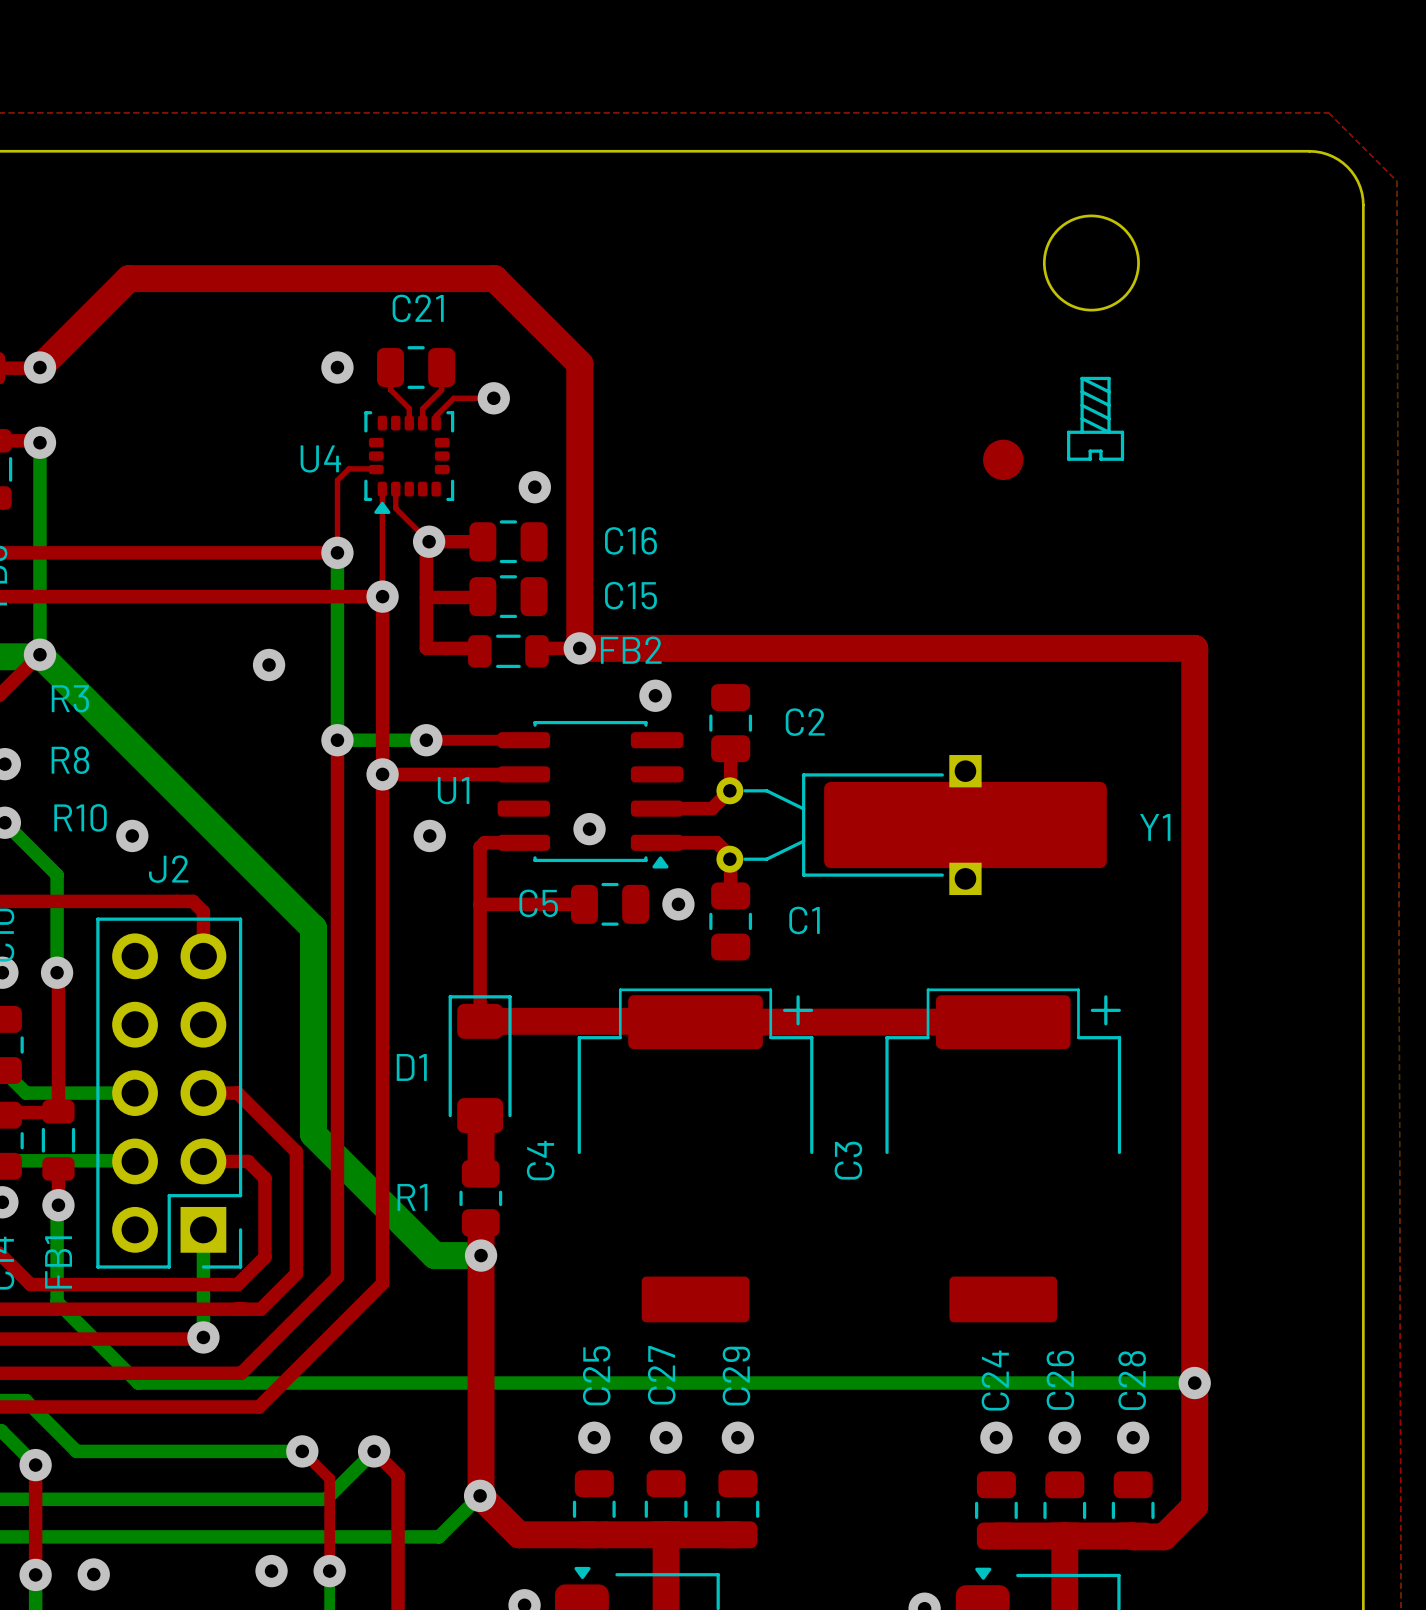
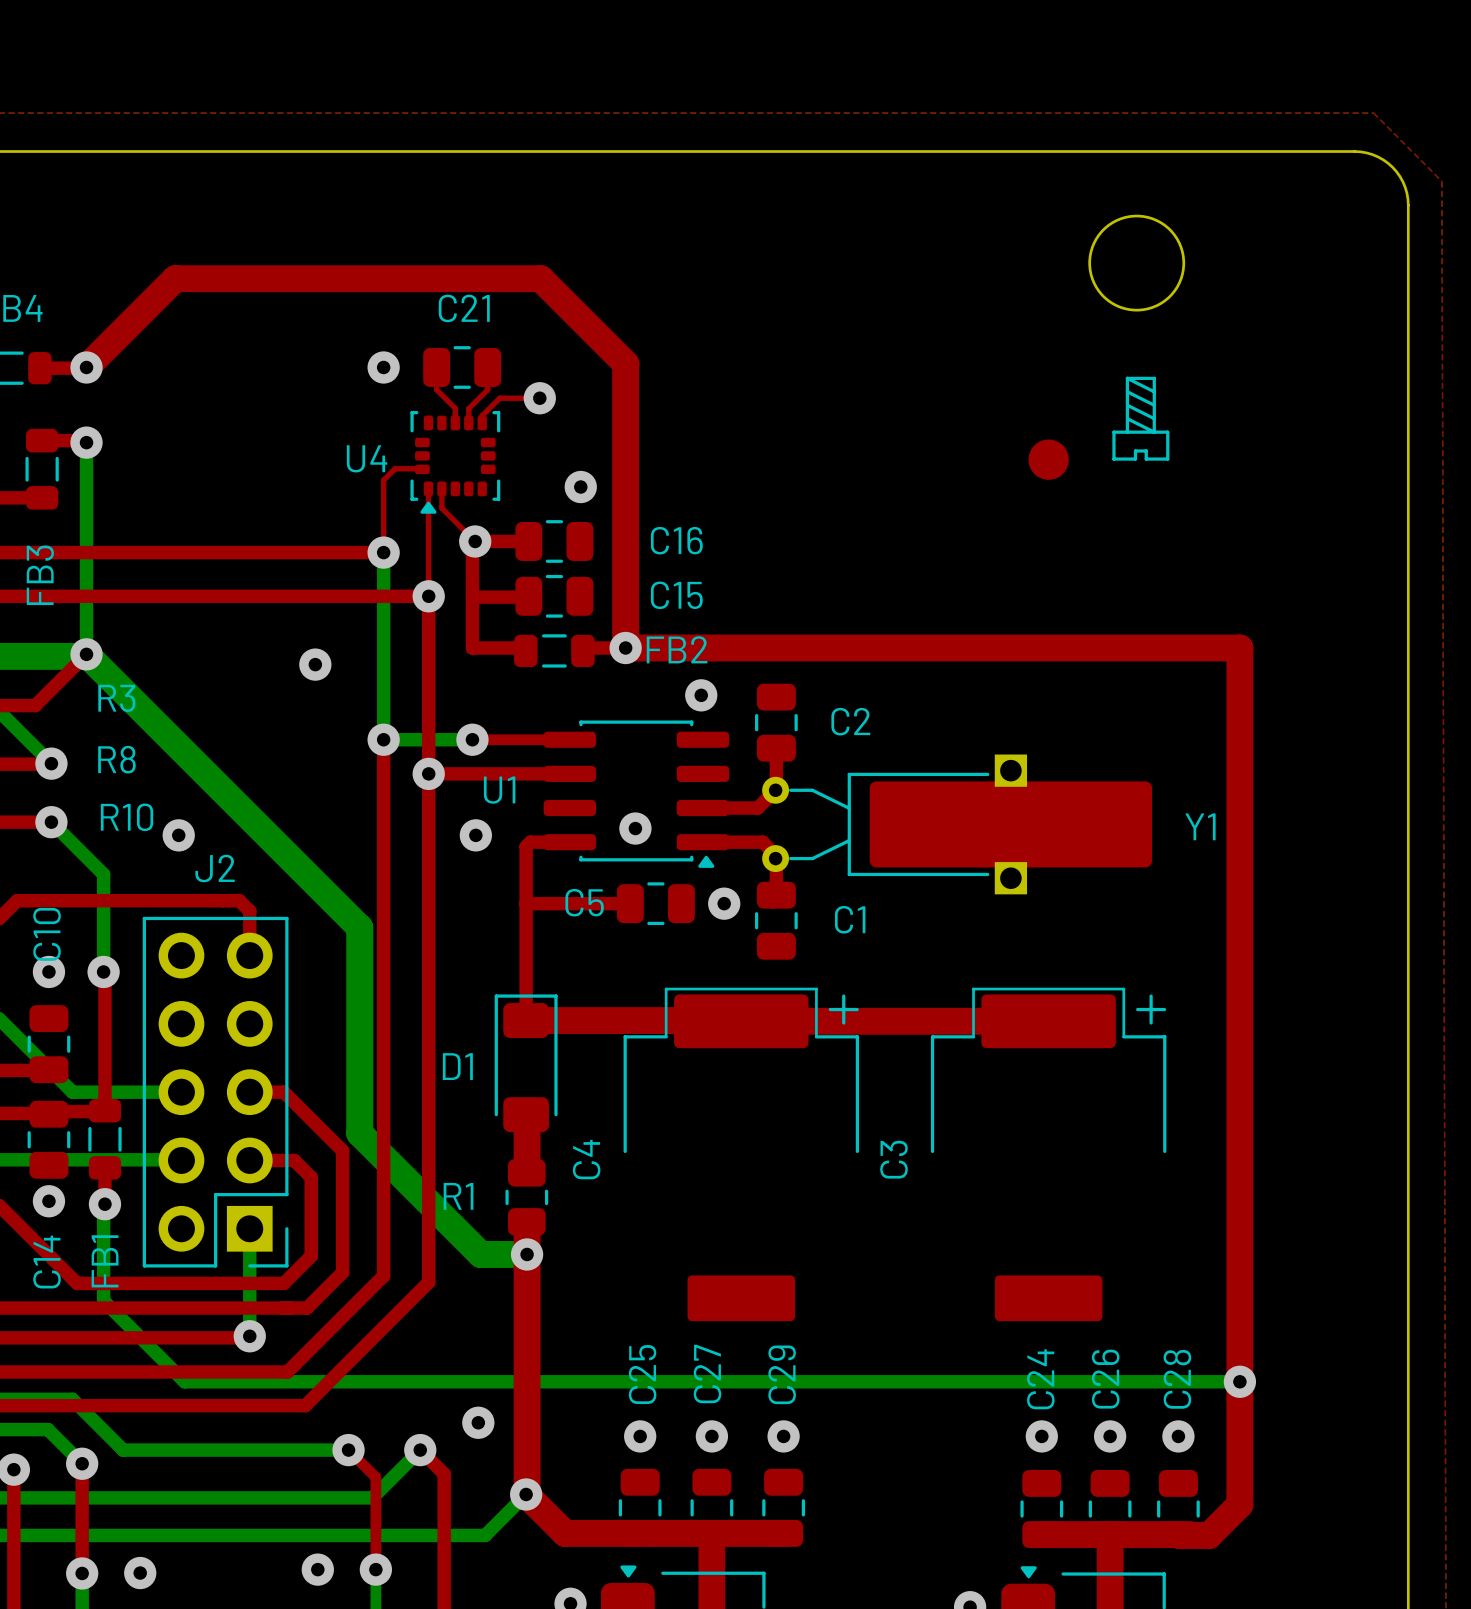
via: none -> (478, 1422)

